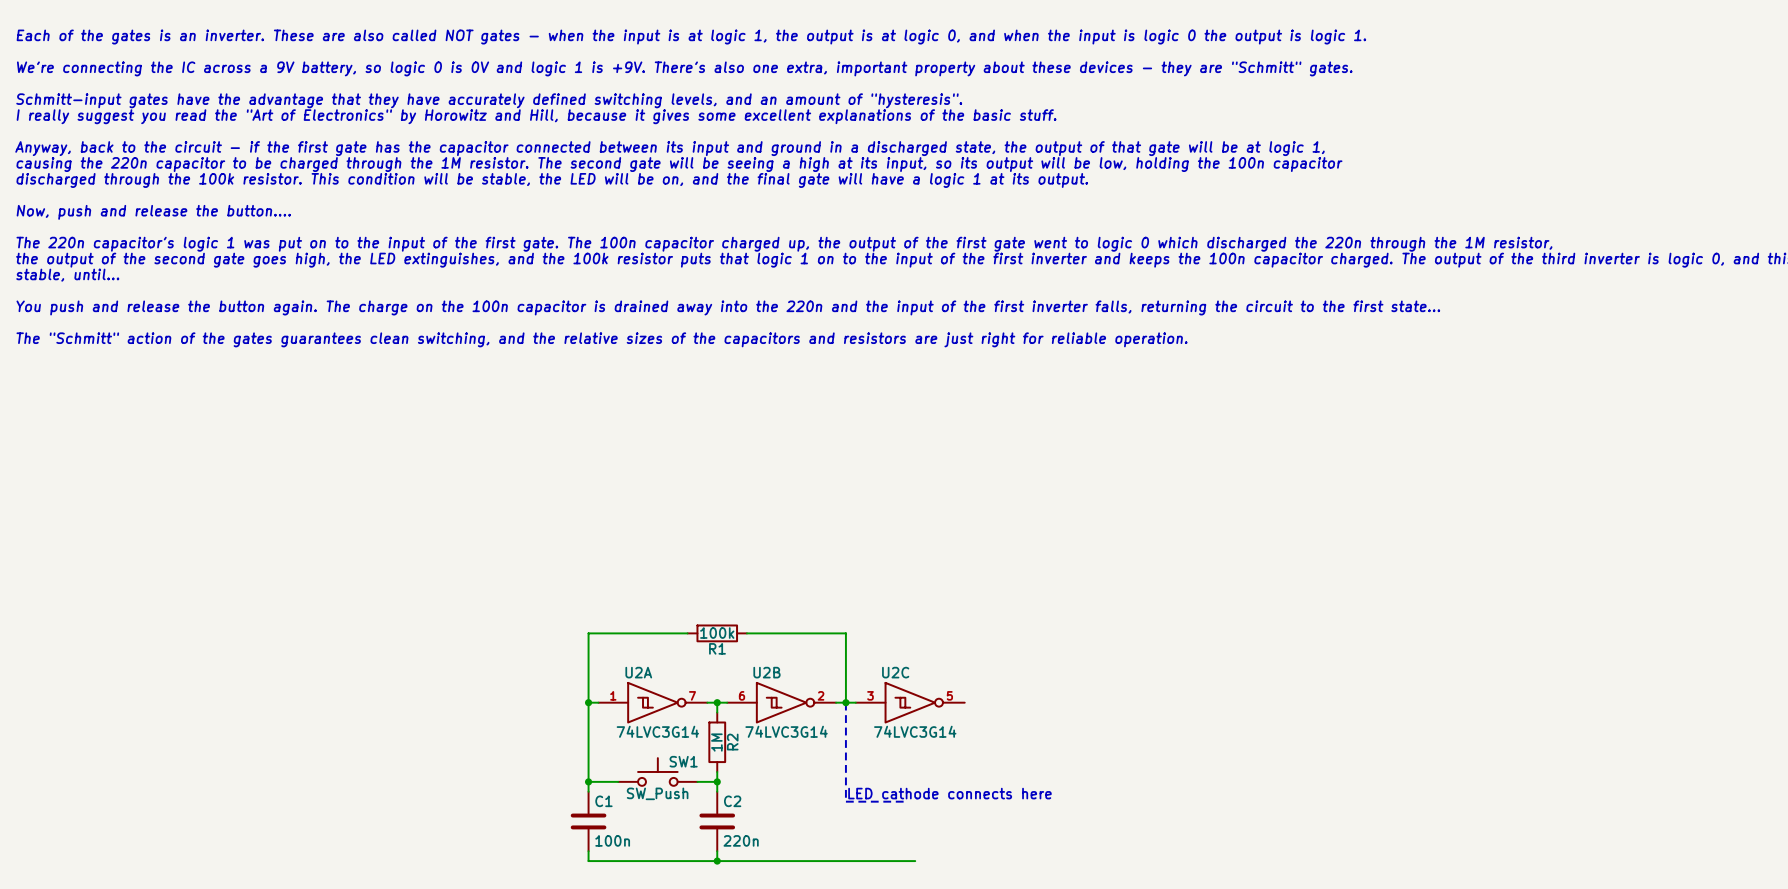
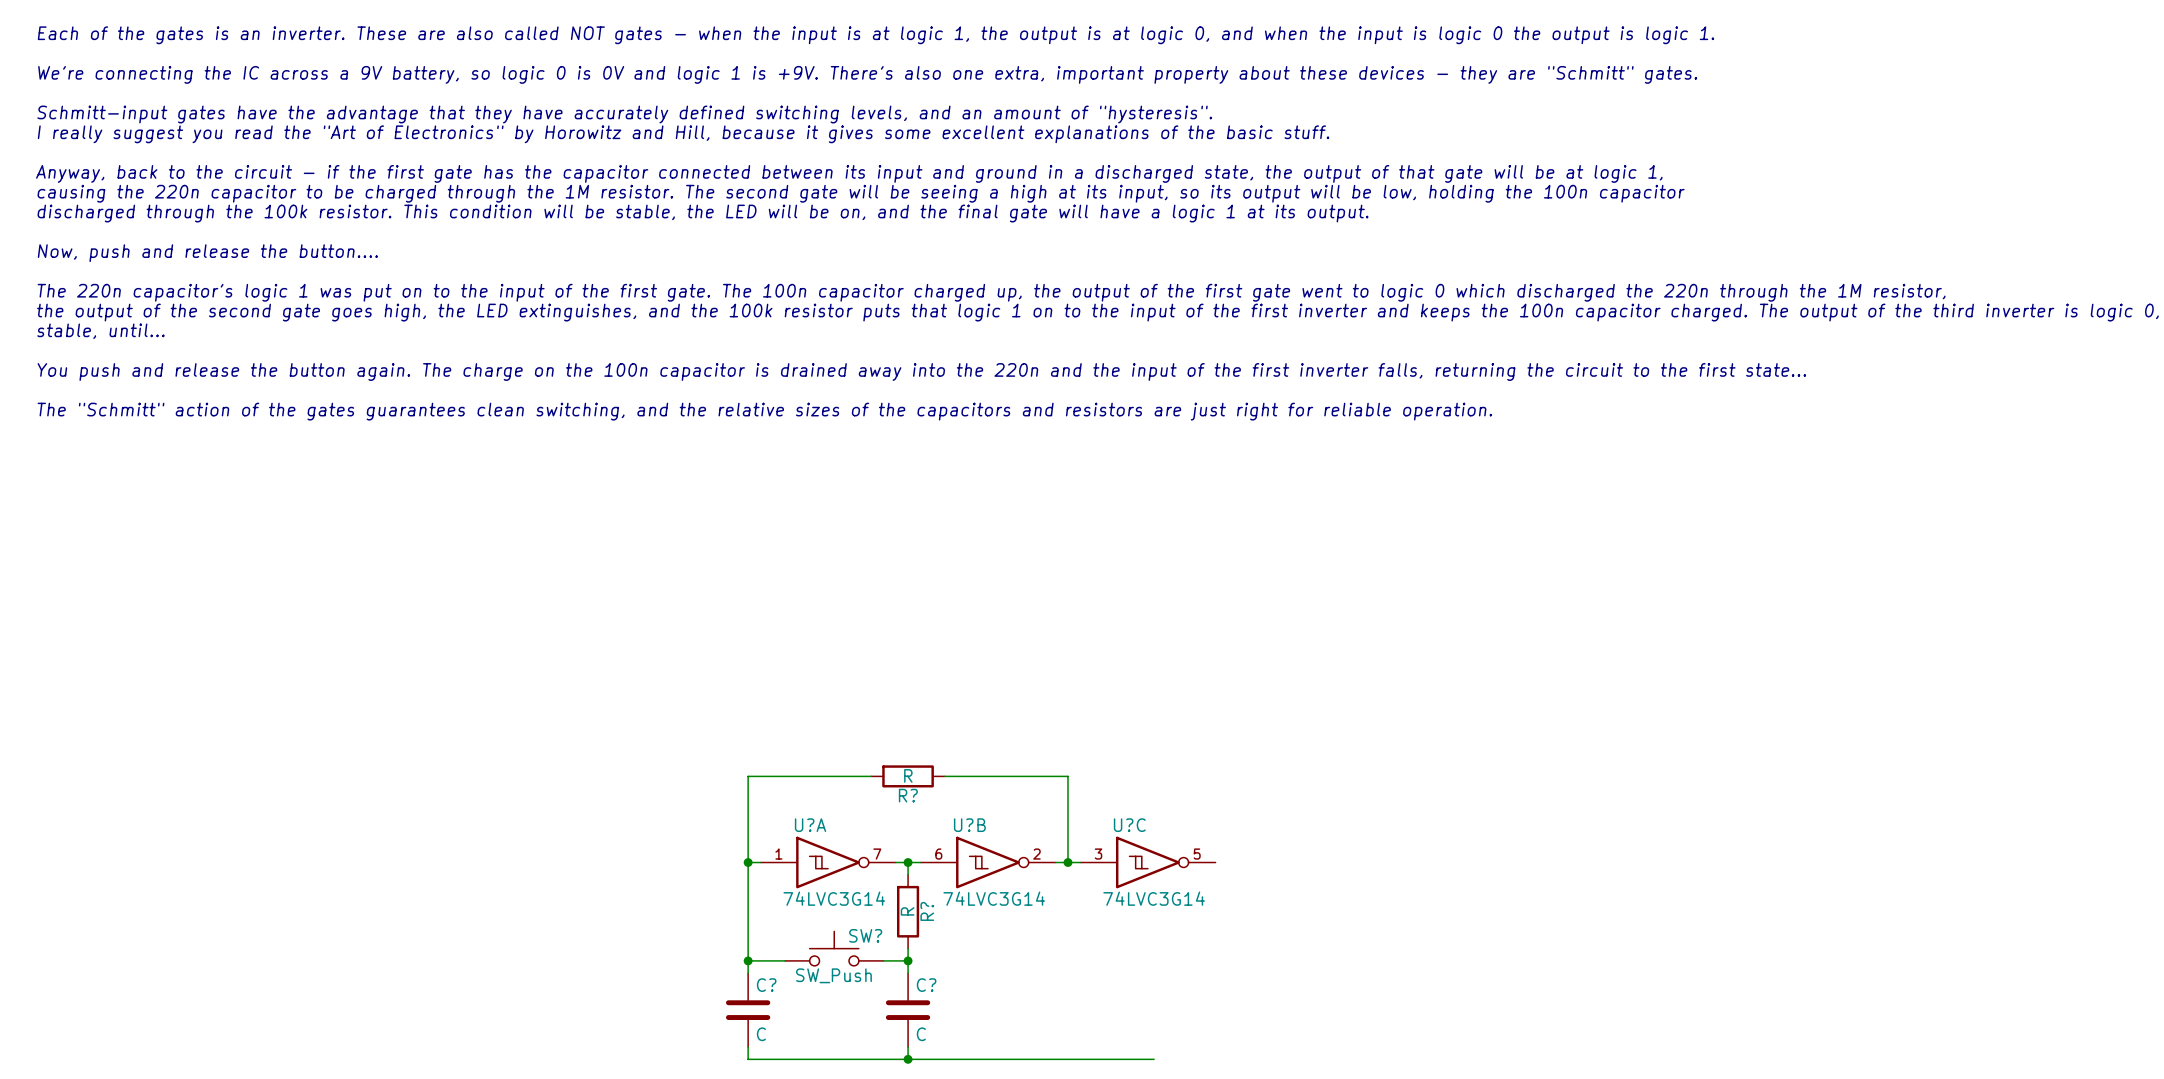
R1 value: 100k (717, 633) -> R (908, 775)
R1 name: R1 (717, 648) -> R? (908, 795)
U2A name: U2A (638, 672) -> U?A (810, 825)
U2B name: U2B (766, 672) -> U?B (969, 825)
U2C name: U2C (895, 672) -> U?C (1129, 825)
line: (845, 702) (845, 801) (905, 801) -> none
R2 value: 1M (716, 742) -> R (907, 911)
R2 name: R2 (732, 742) -> R? (927, 911)
SW1 name: SW1 (683, 761) -> SW? (865, 935)
text: LED cathode connects here (949, 793) -> none
C1 name: C1 (603, 801) -> C? (766, 985)
C2 name: C2 (732, 801) -> C? (926, 985)
C1 value: 100n (612, 840) -> C (761, 1034)
C2 value: 220n (741, 840) -> C (921, 1034)

